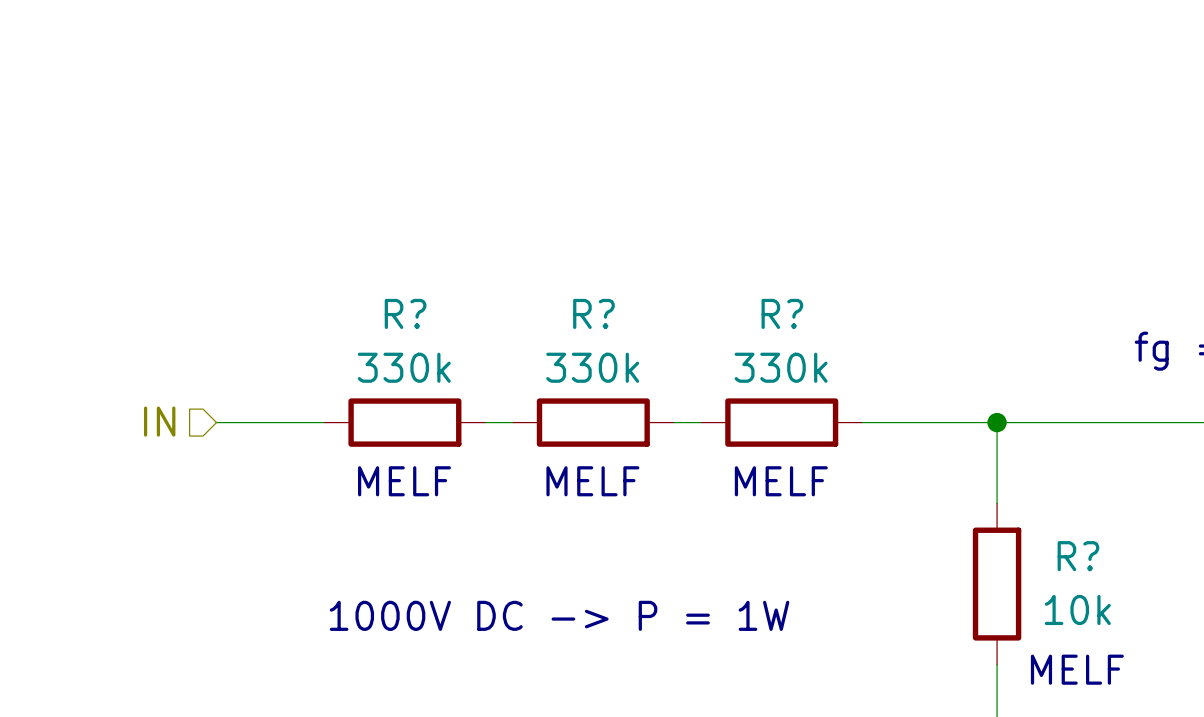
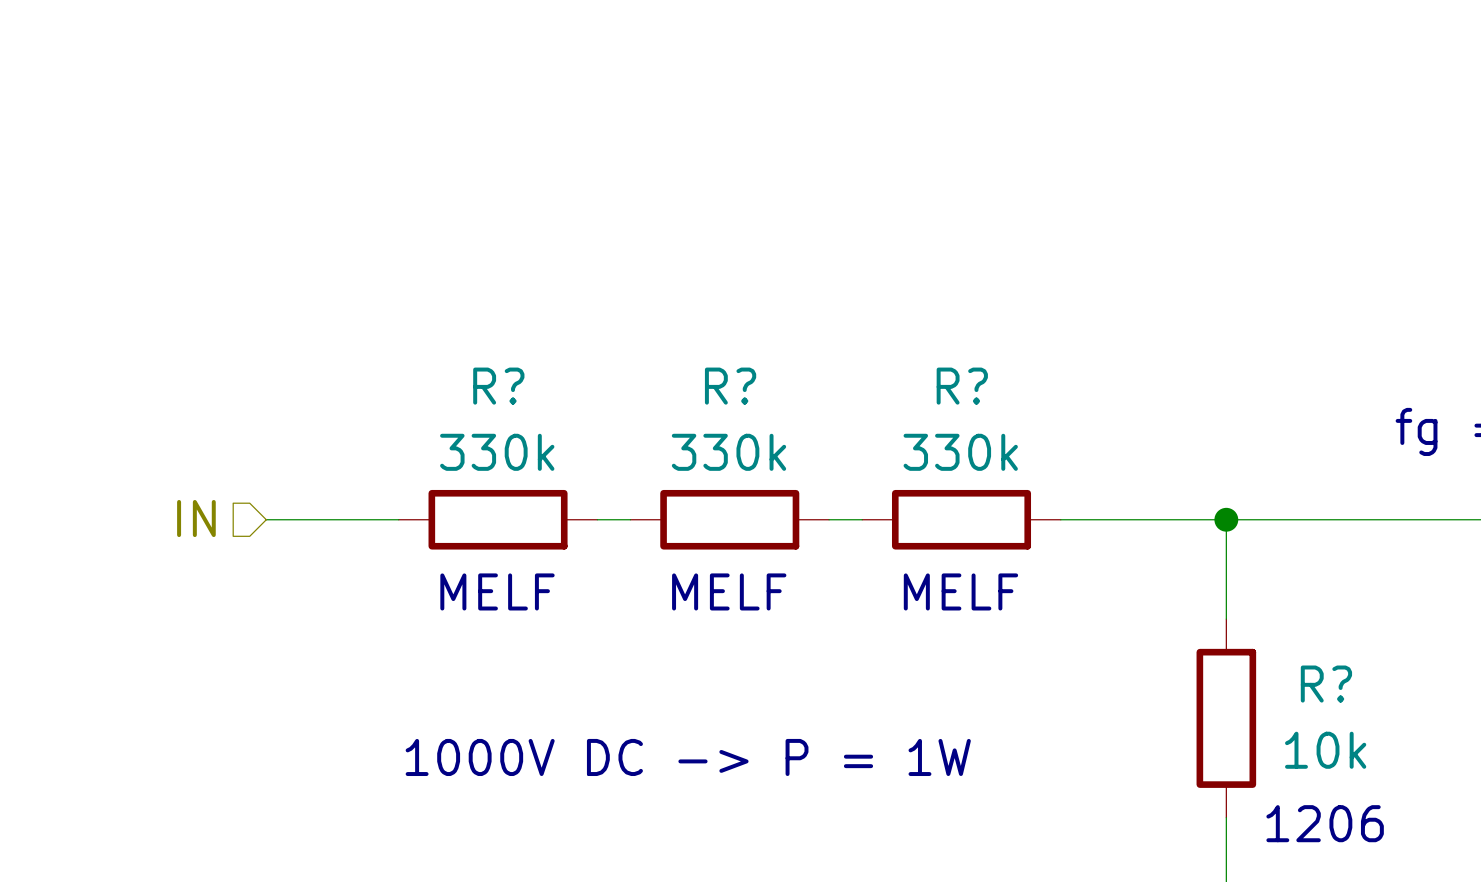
text: MELF (1077, 669) -> 1206 (1325, 823)

